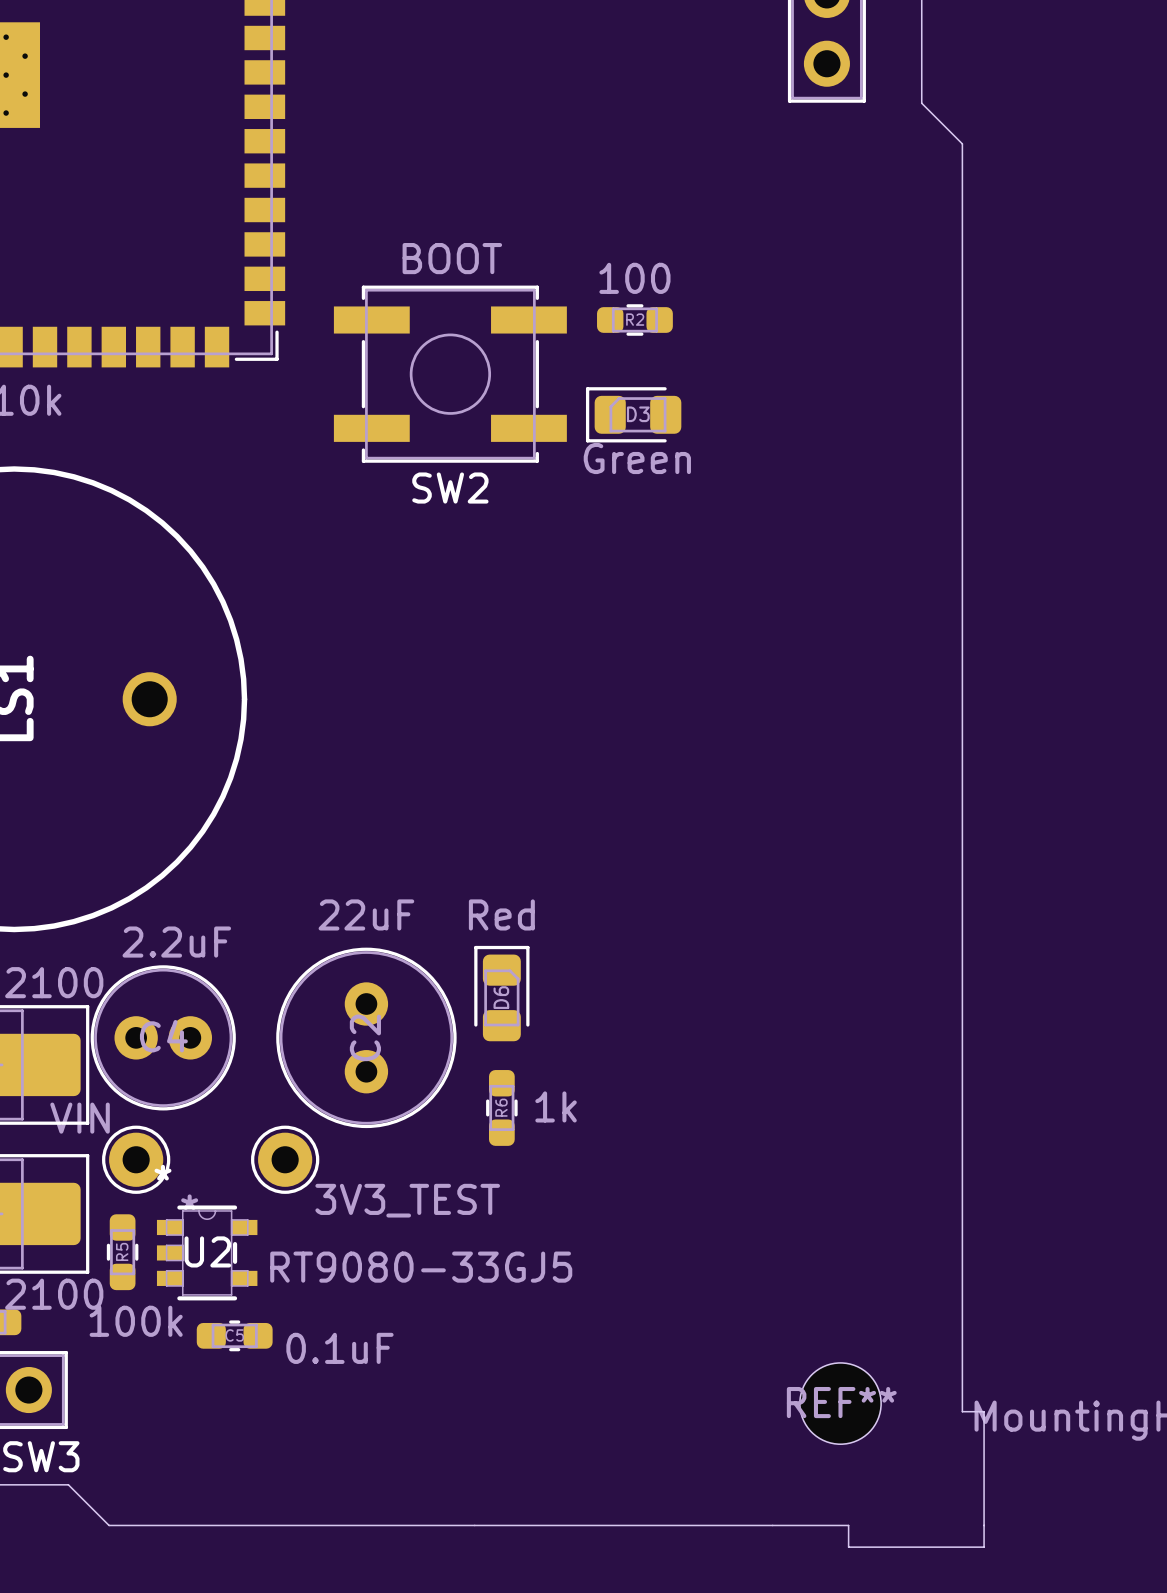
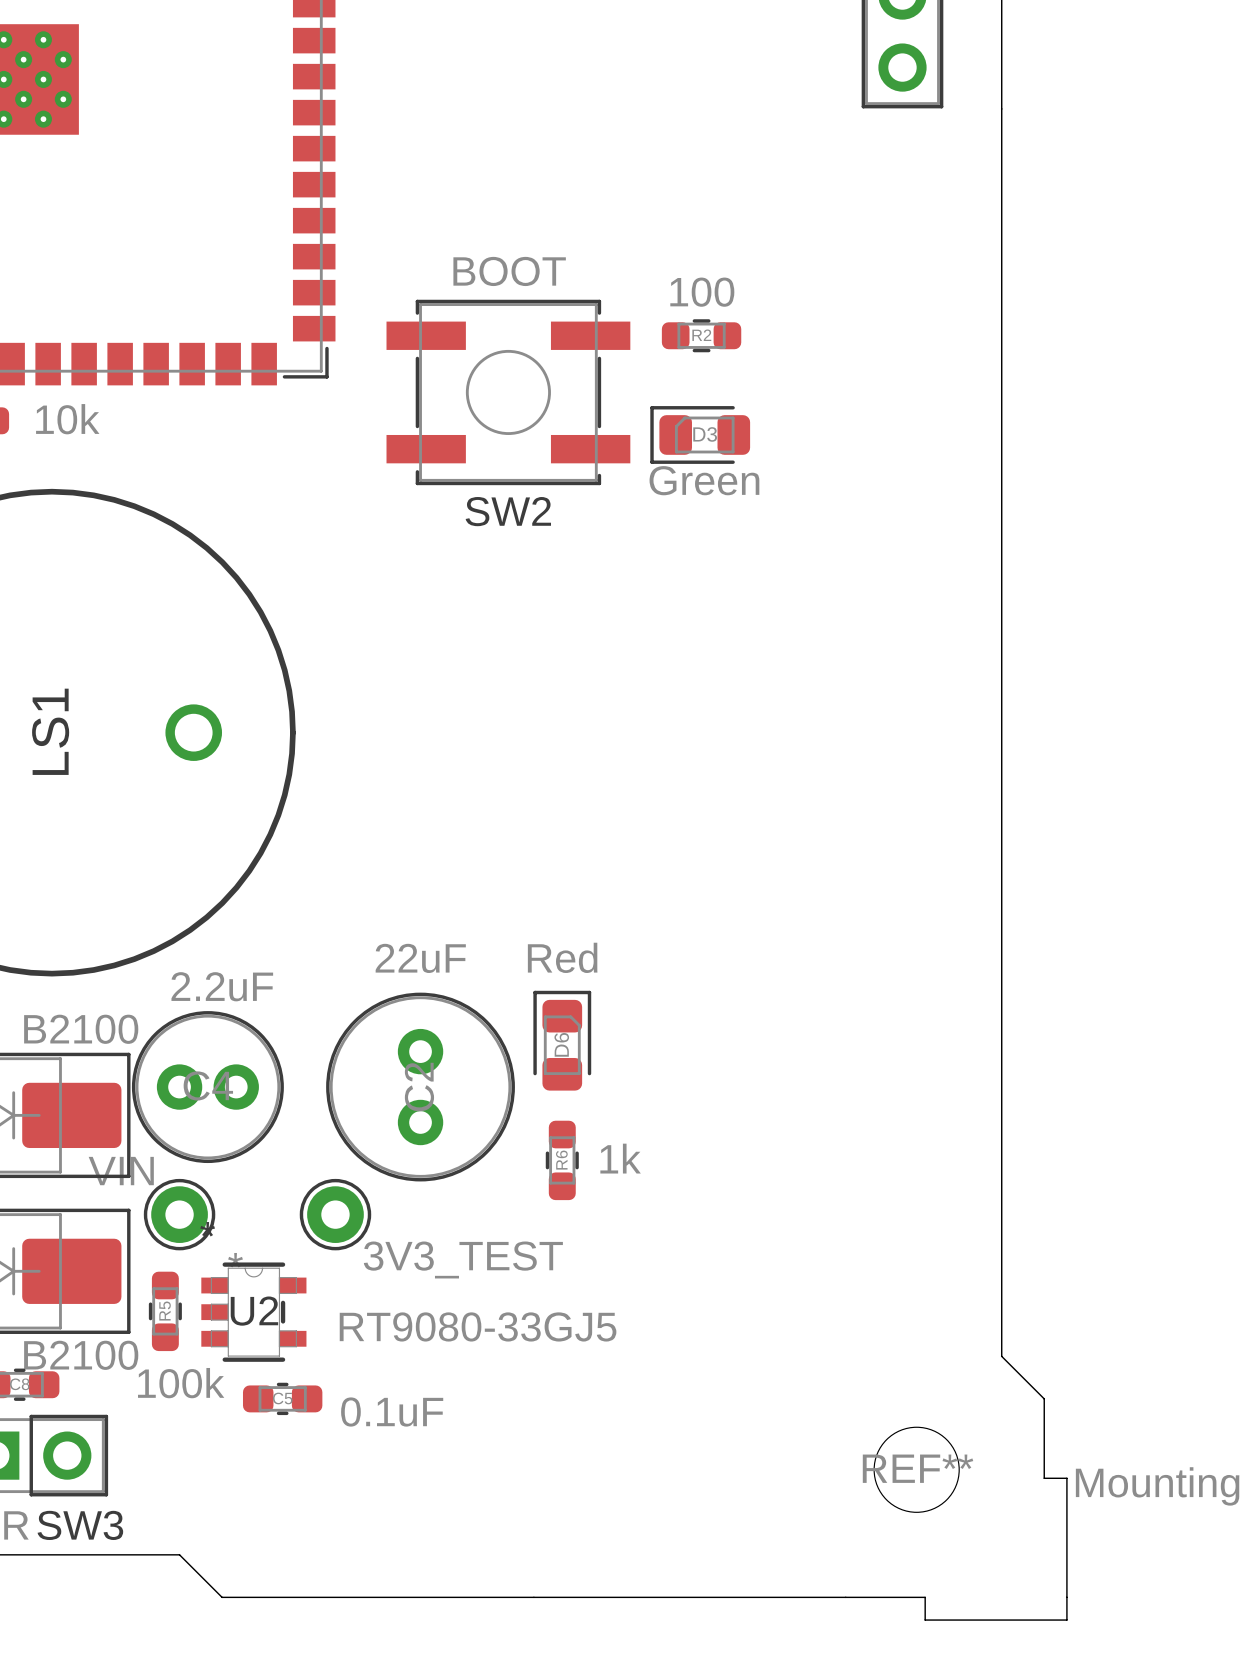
board edge: (921, 103) (962, 143) (962, 1335) -> (1001, 108) (1001, 1356) (1044, 1398)
board edge: (68, 1484) (109, 1525) (176, 1525) -> (108, 1554) (179, 1554) (222, 1597)

